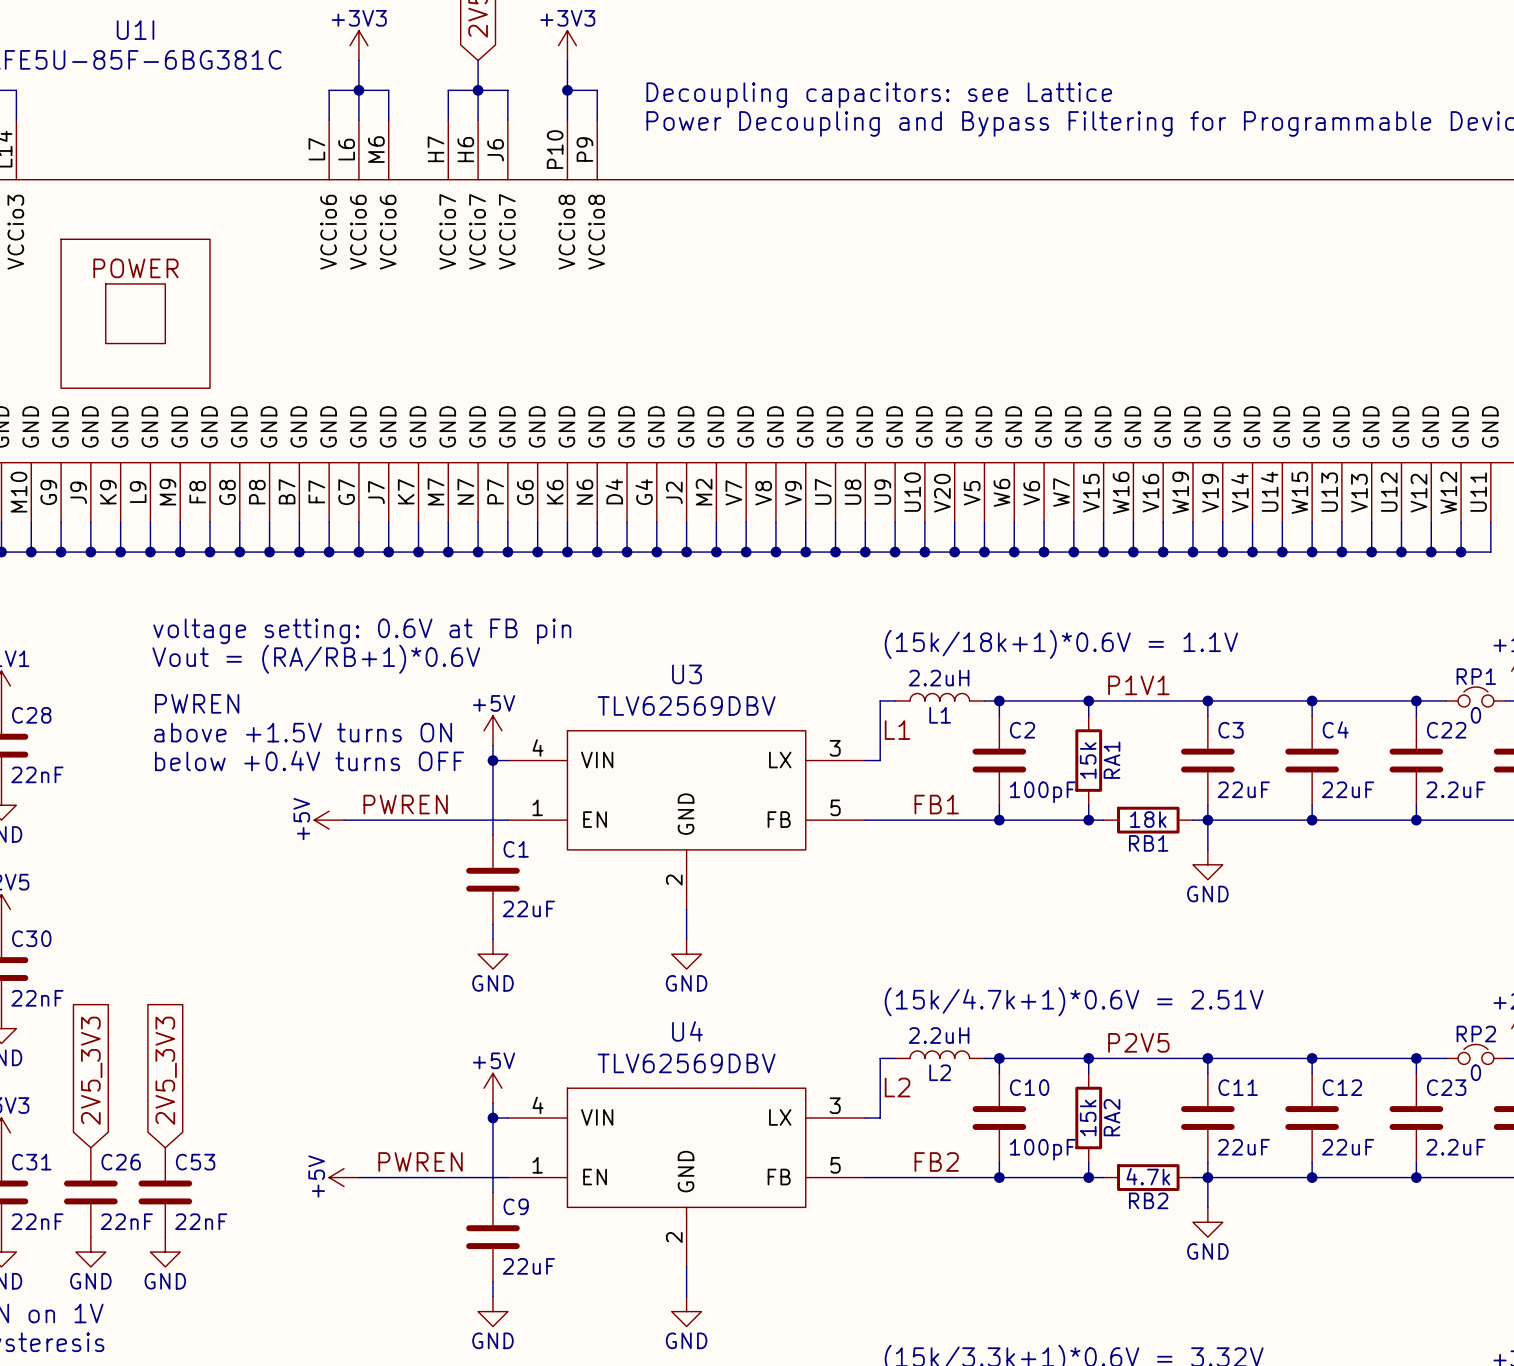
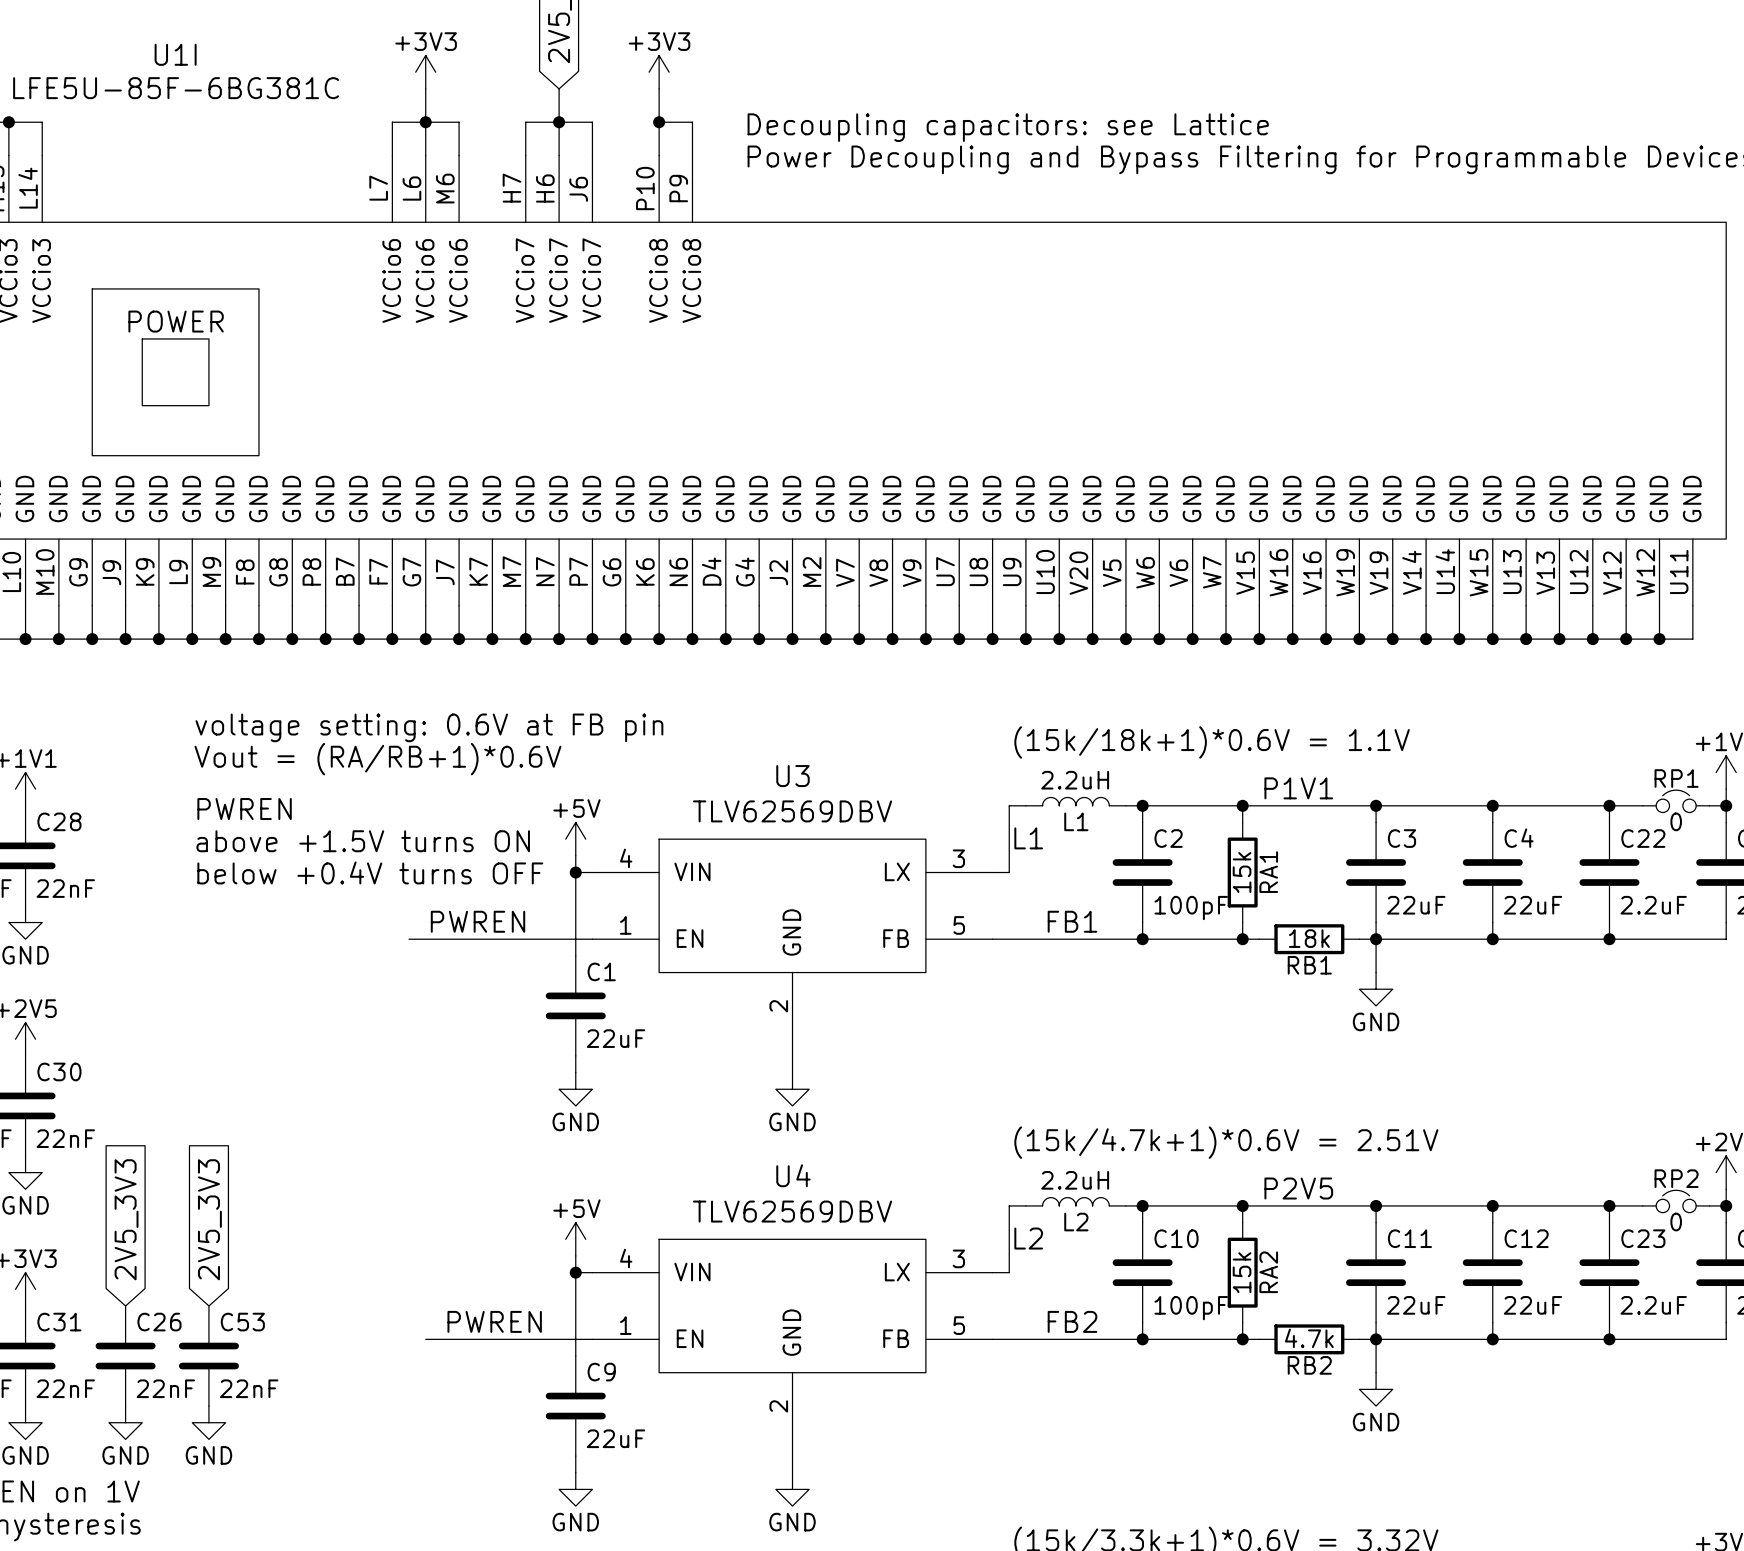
power symbol: +5V (329, 820) -> none
power symbol: +5V (344, 1177) -> none

